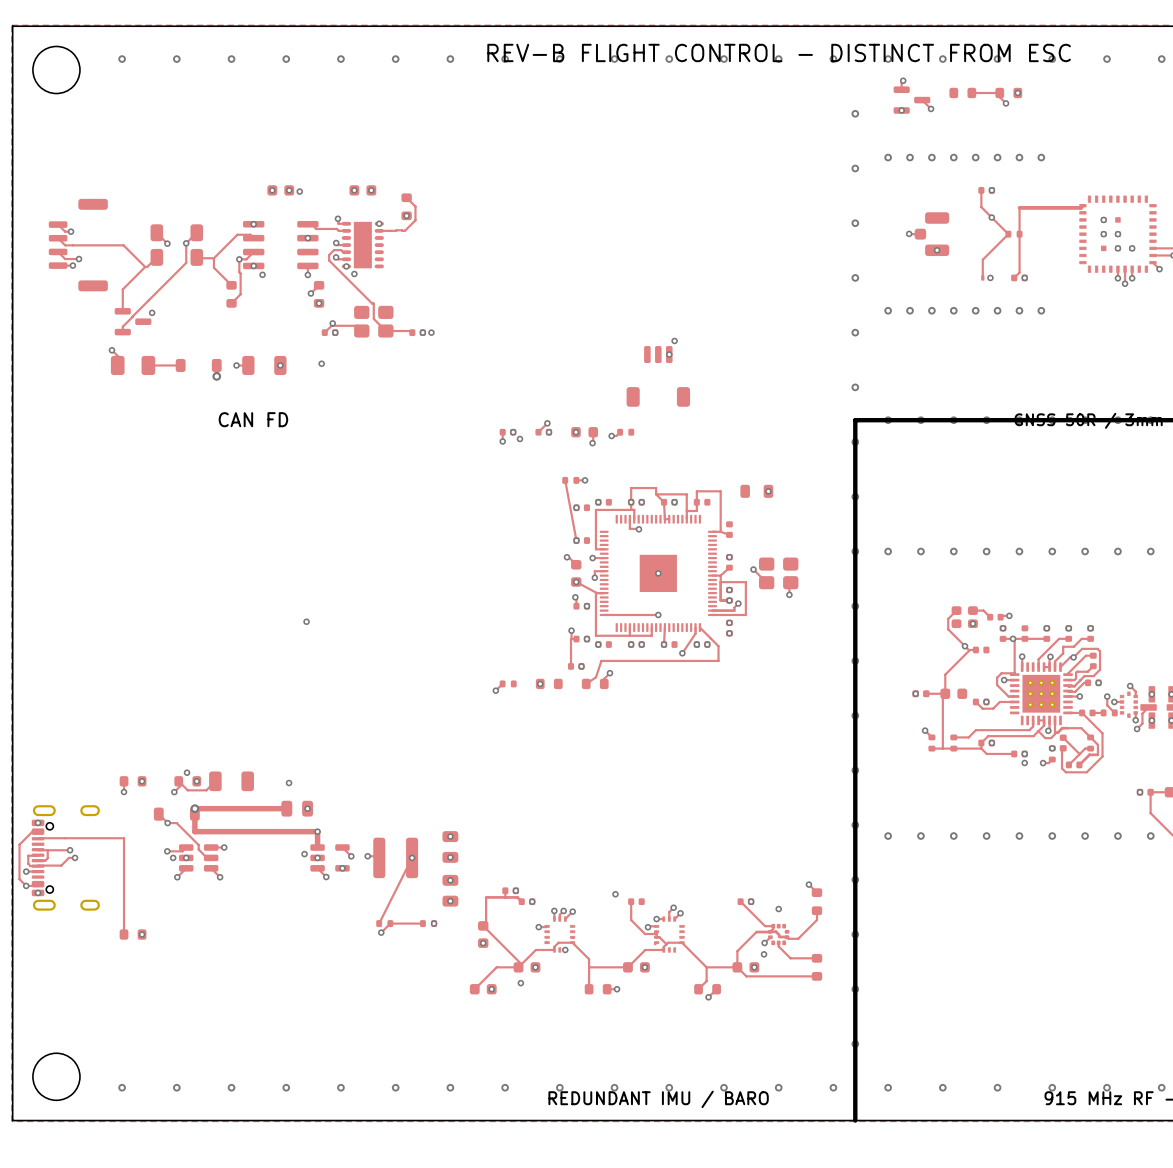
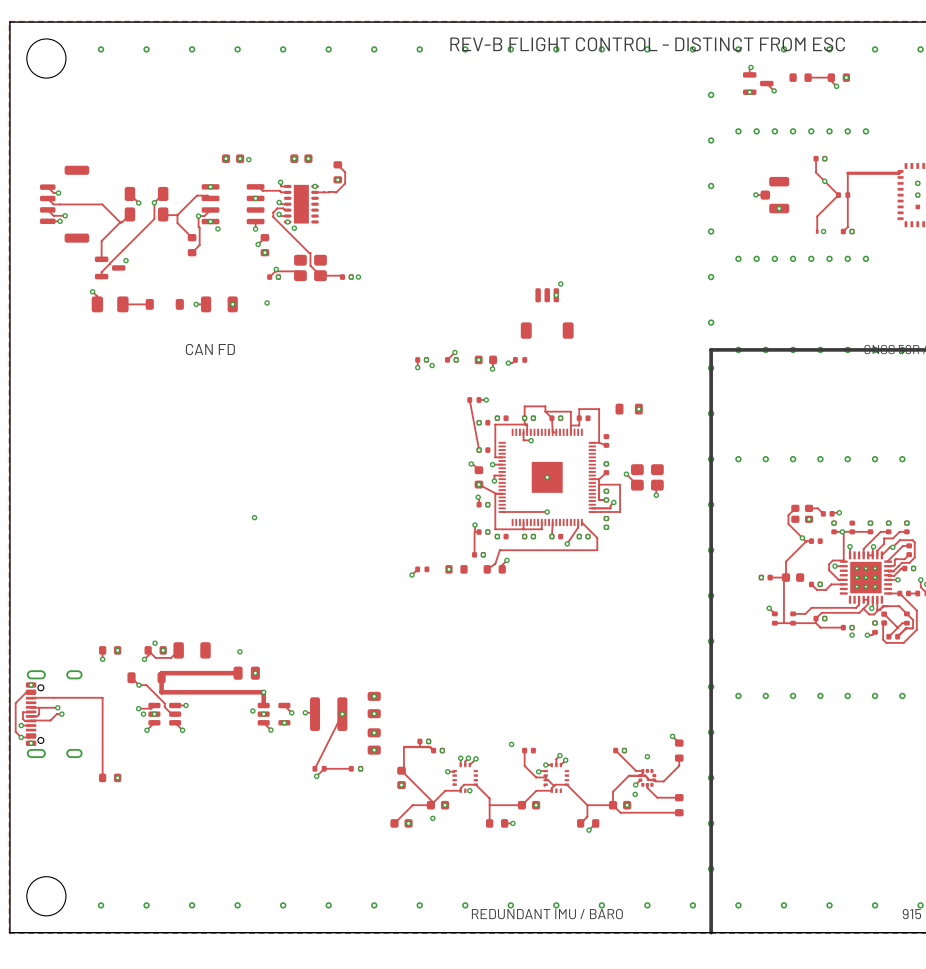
via: (216, 376) -> none
via: (194, 808) -> none

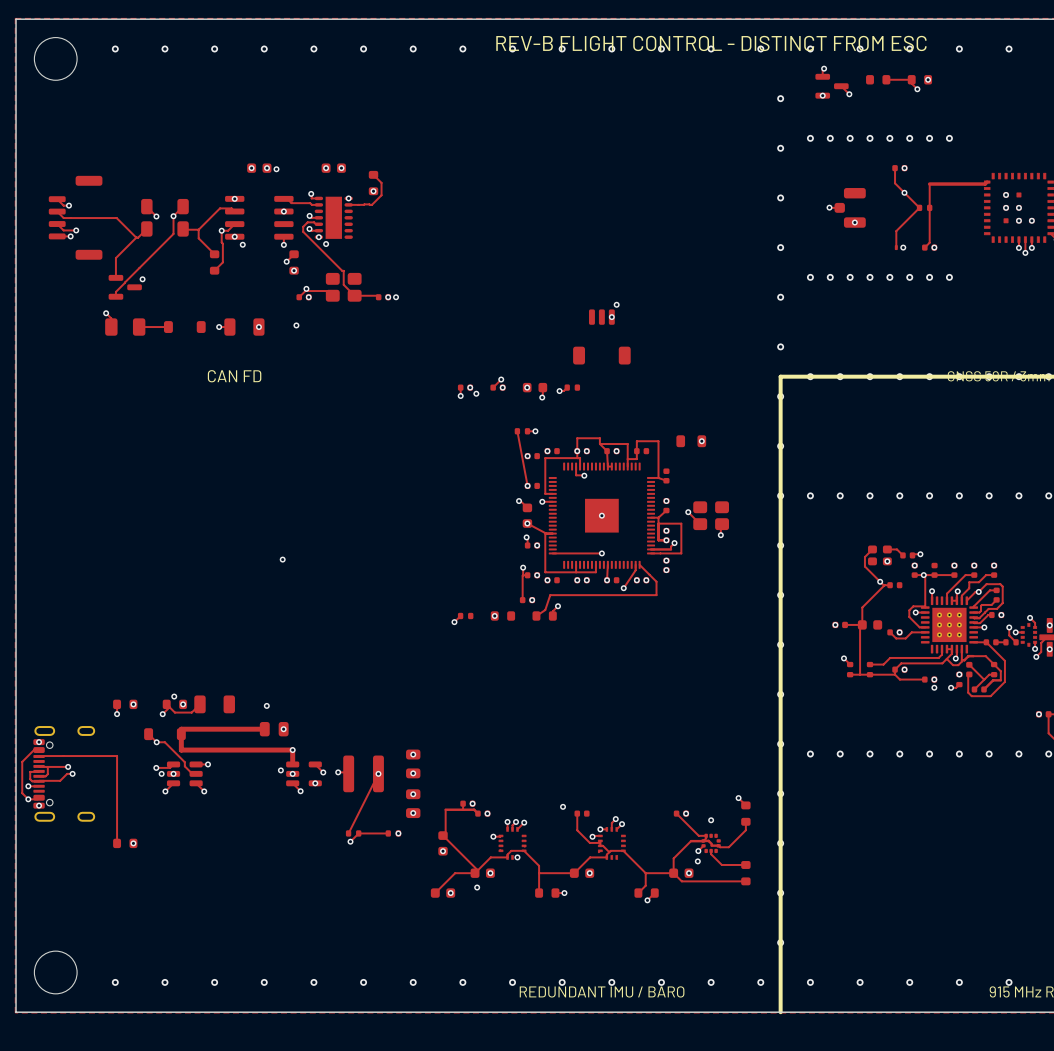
track: (502, 475) (494, 475) (494, 481) -> none
via: (494, 481) -> none

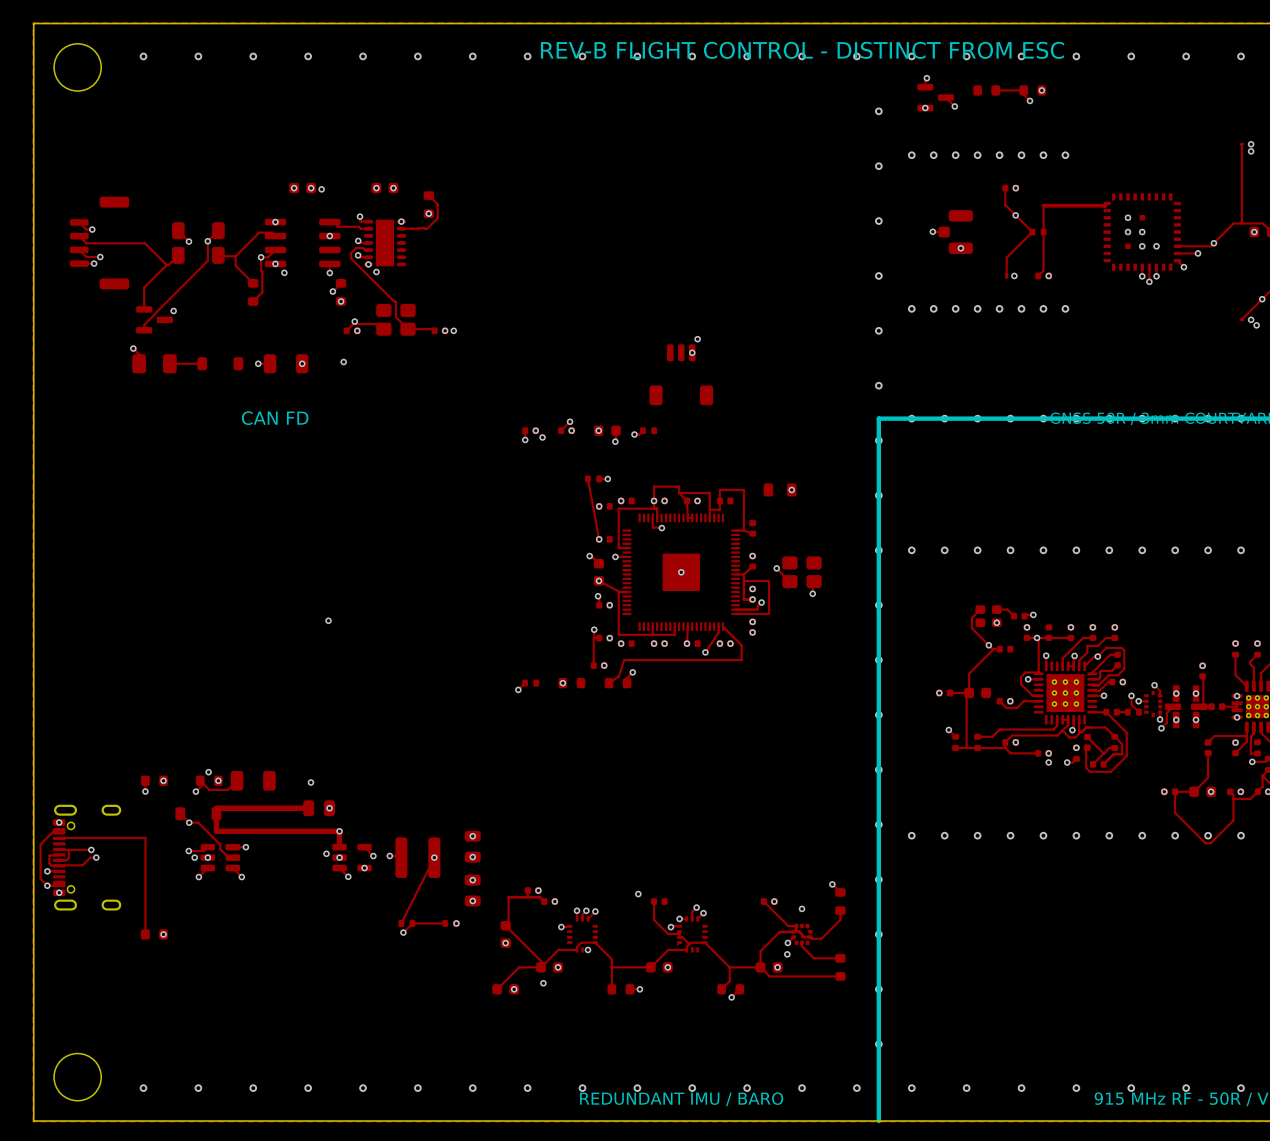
track: (552, 553) (601, 553) -> none
via: (601, 553) -> none

